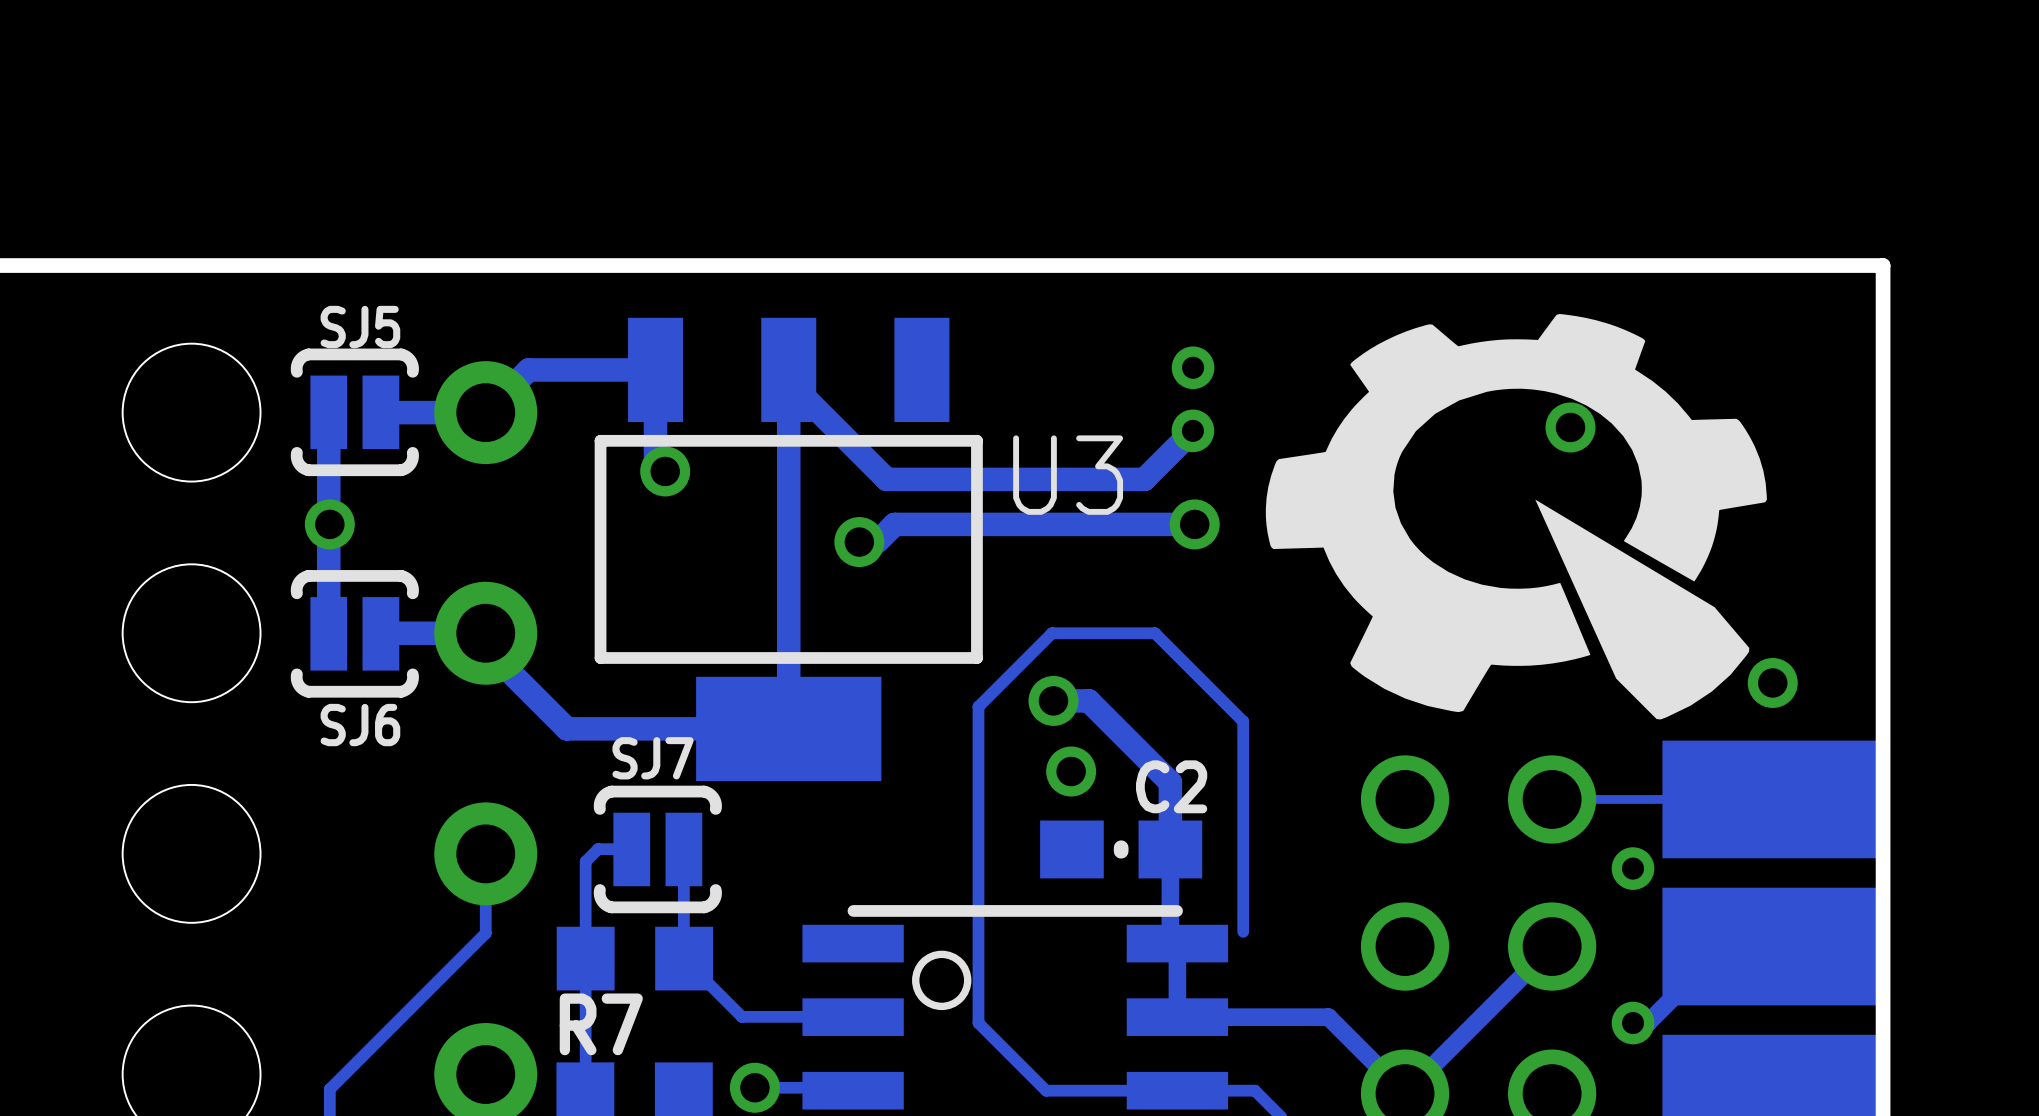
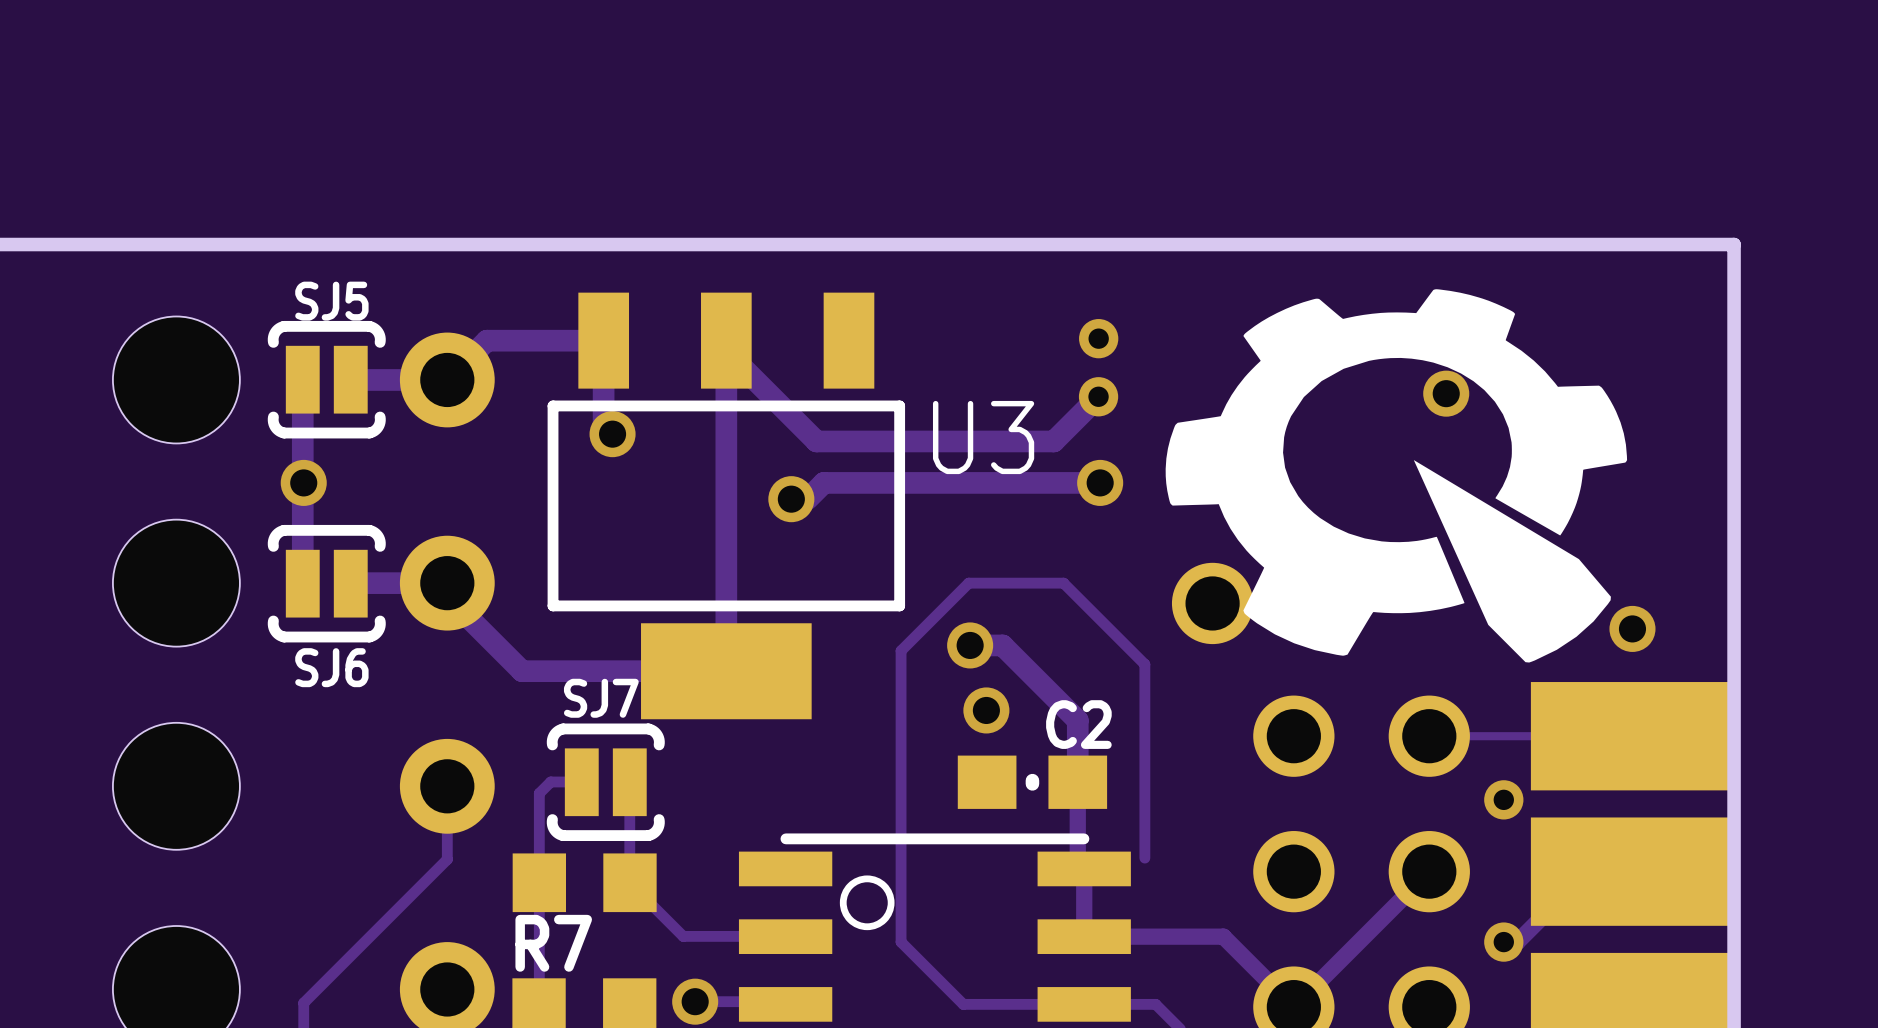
part: none -> (1212, 603)

